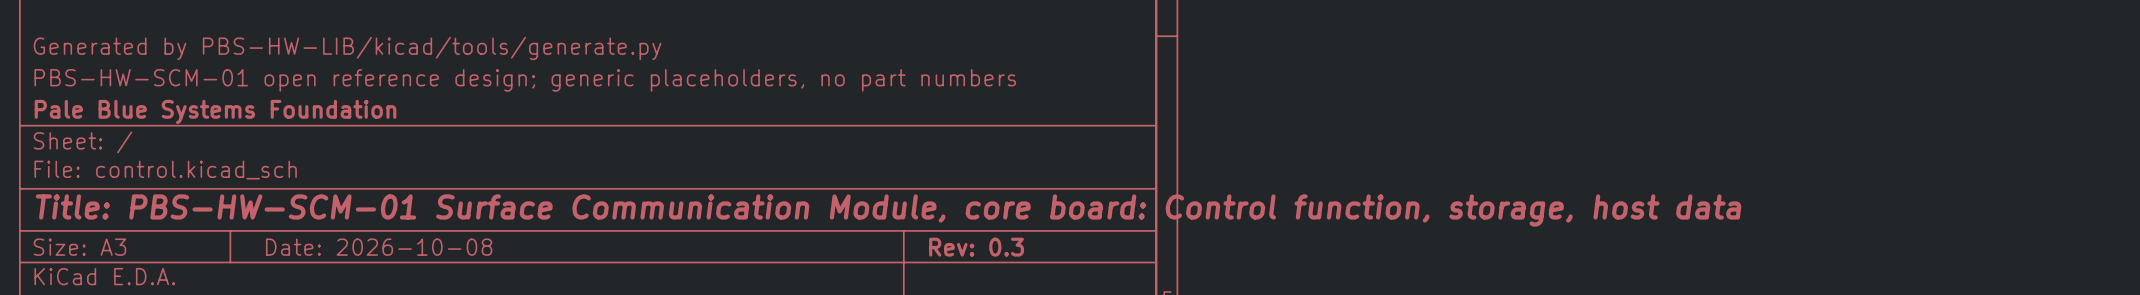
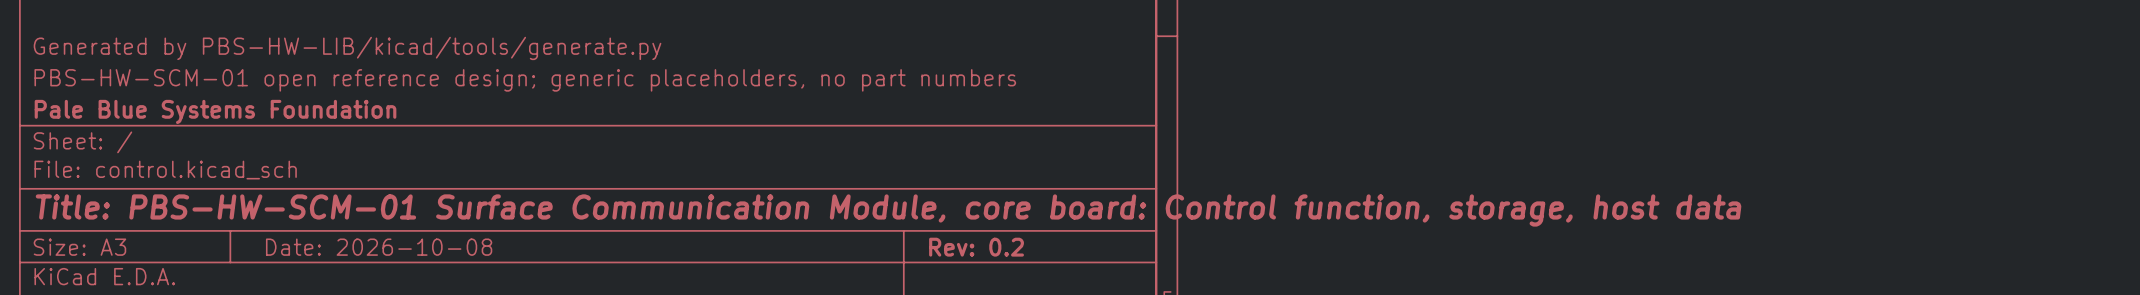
title block: Rev: 0.3 (976, 247) -> Rev: 0.2 (976, 247)

